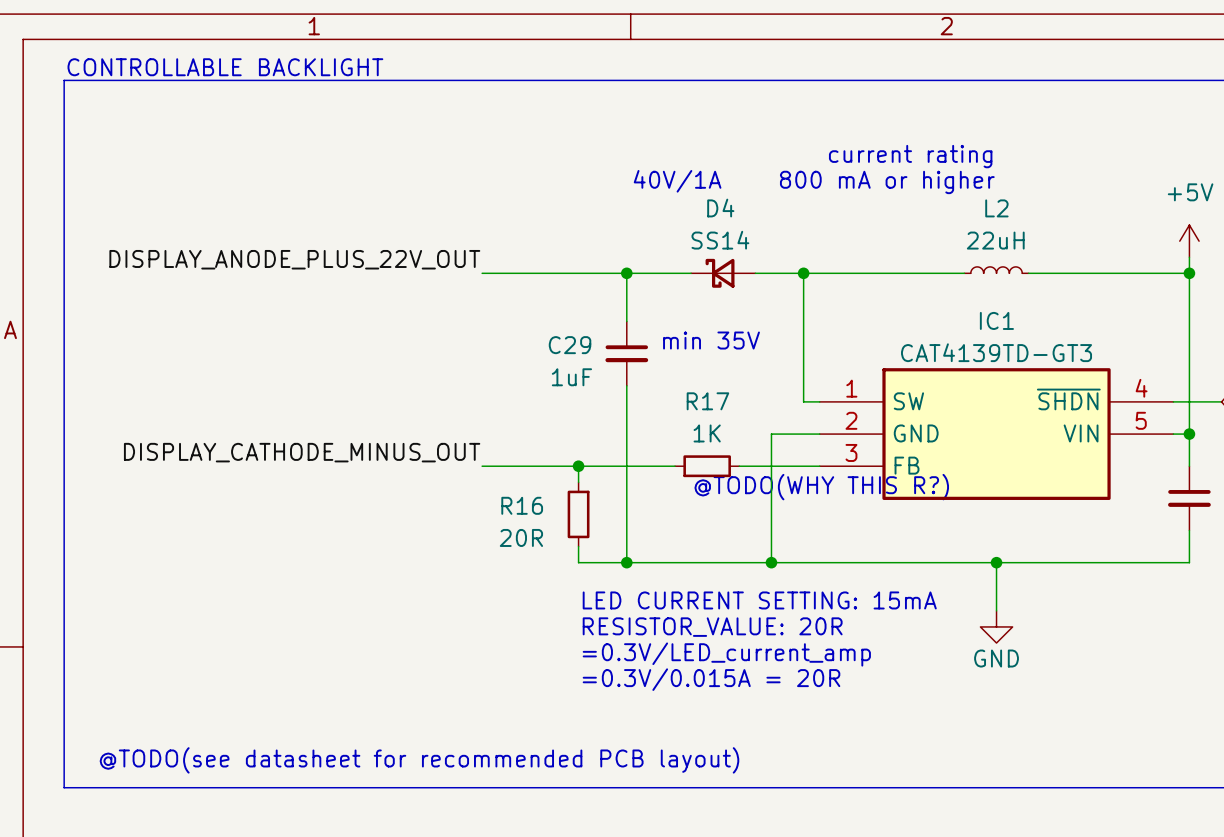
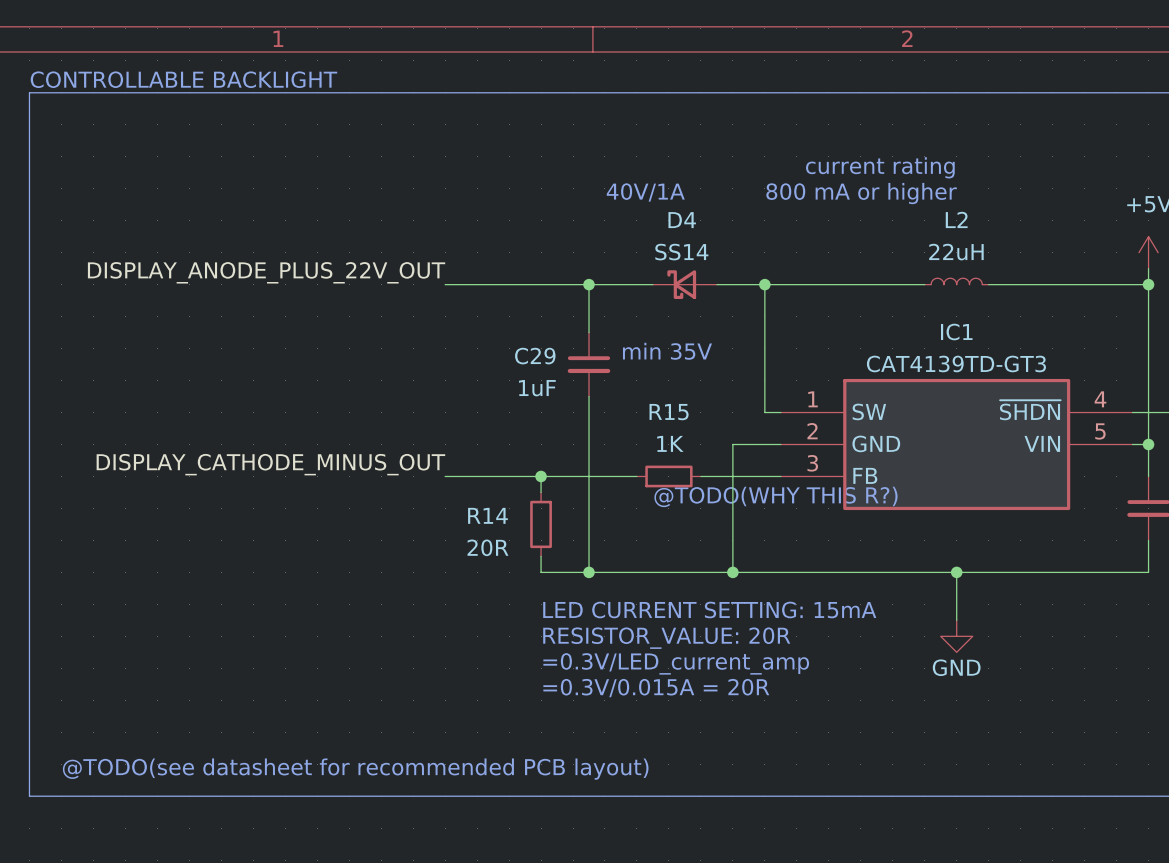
R17 name: R17 (707, 401) -> R15 (669, 412)
R16 name: R16 (522, 505) -> R14 (487, 515)

